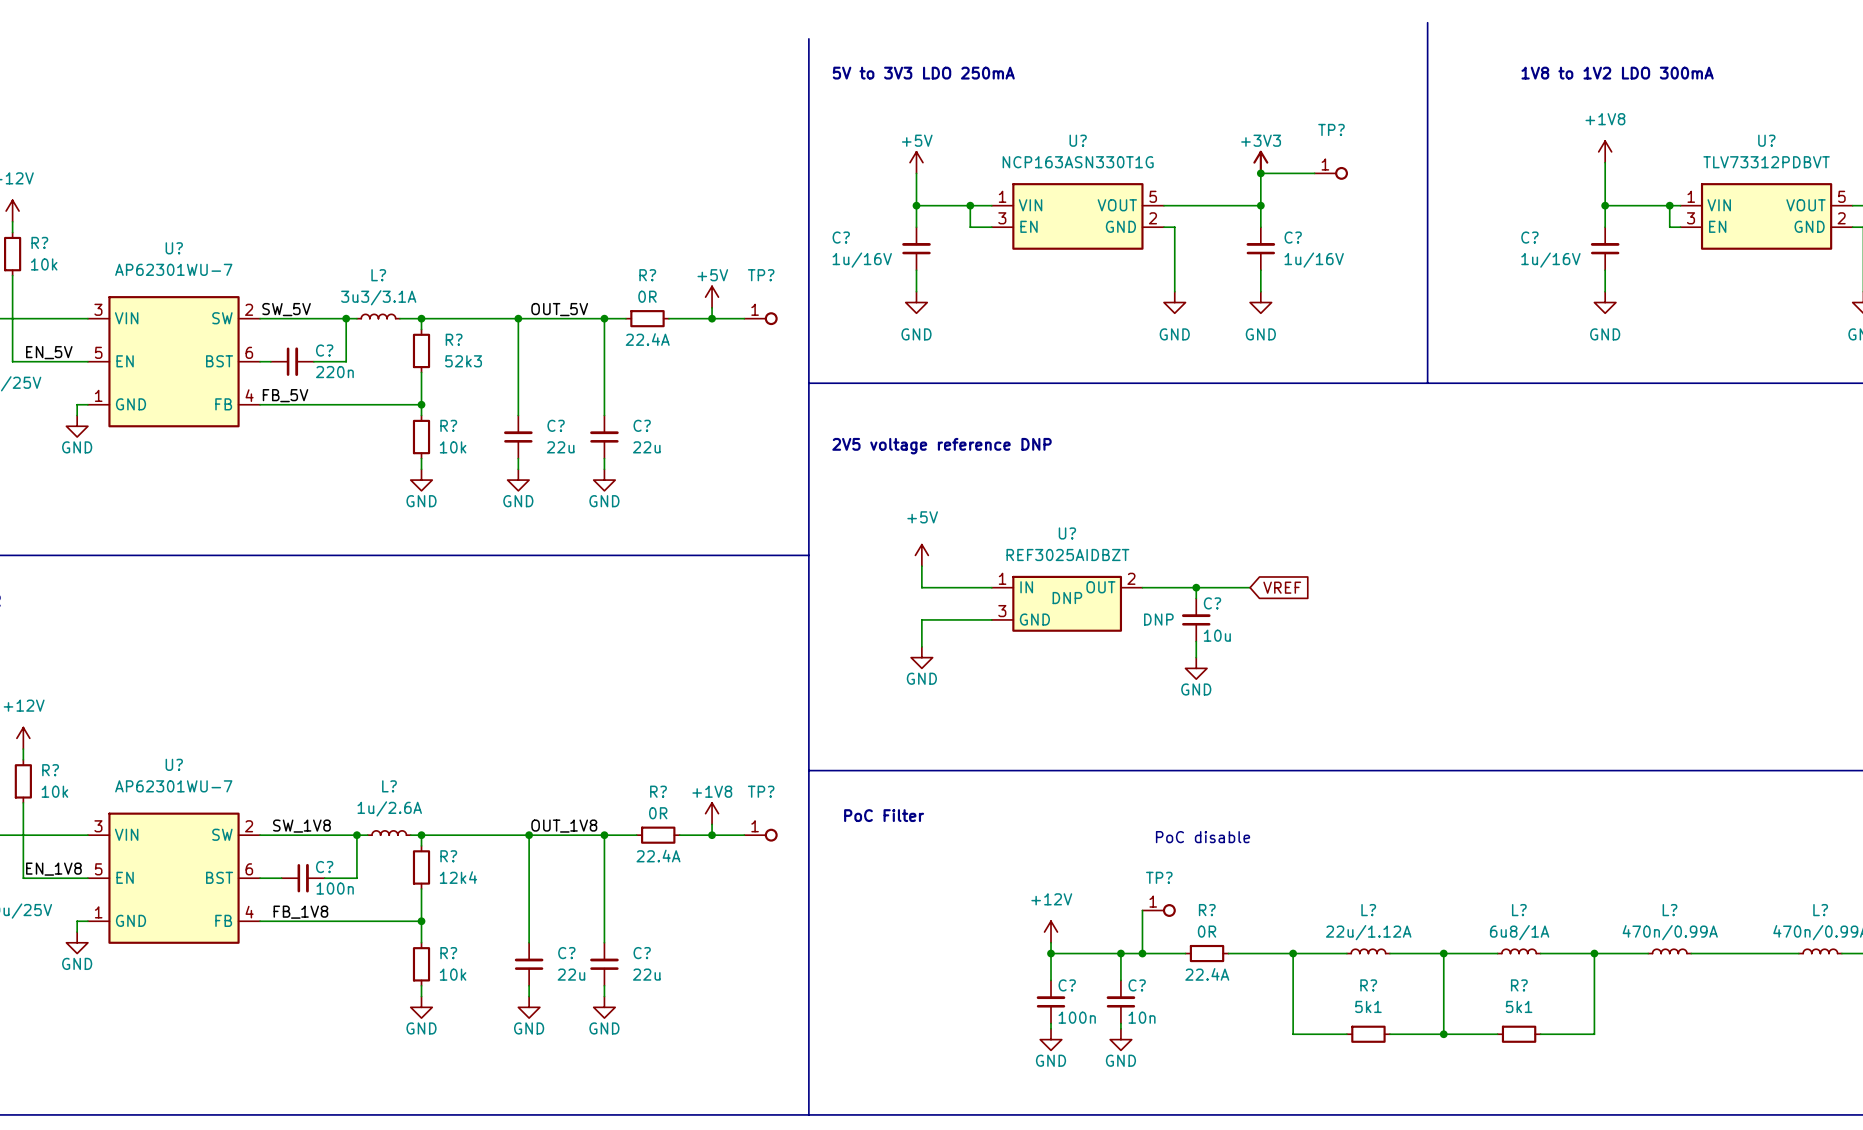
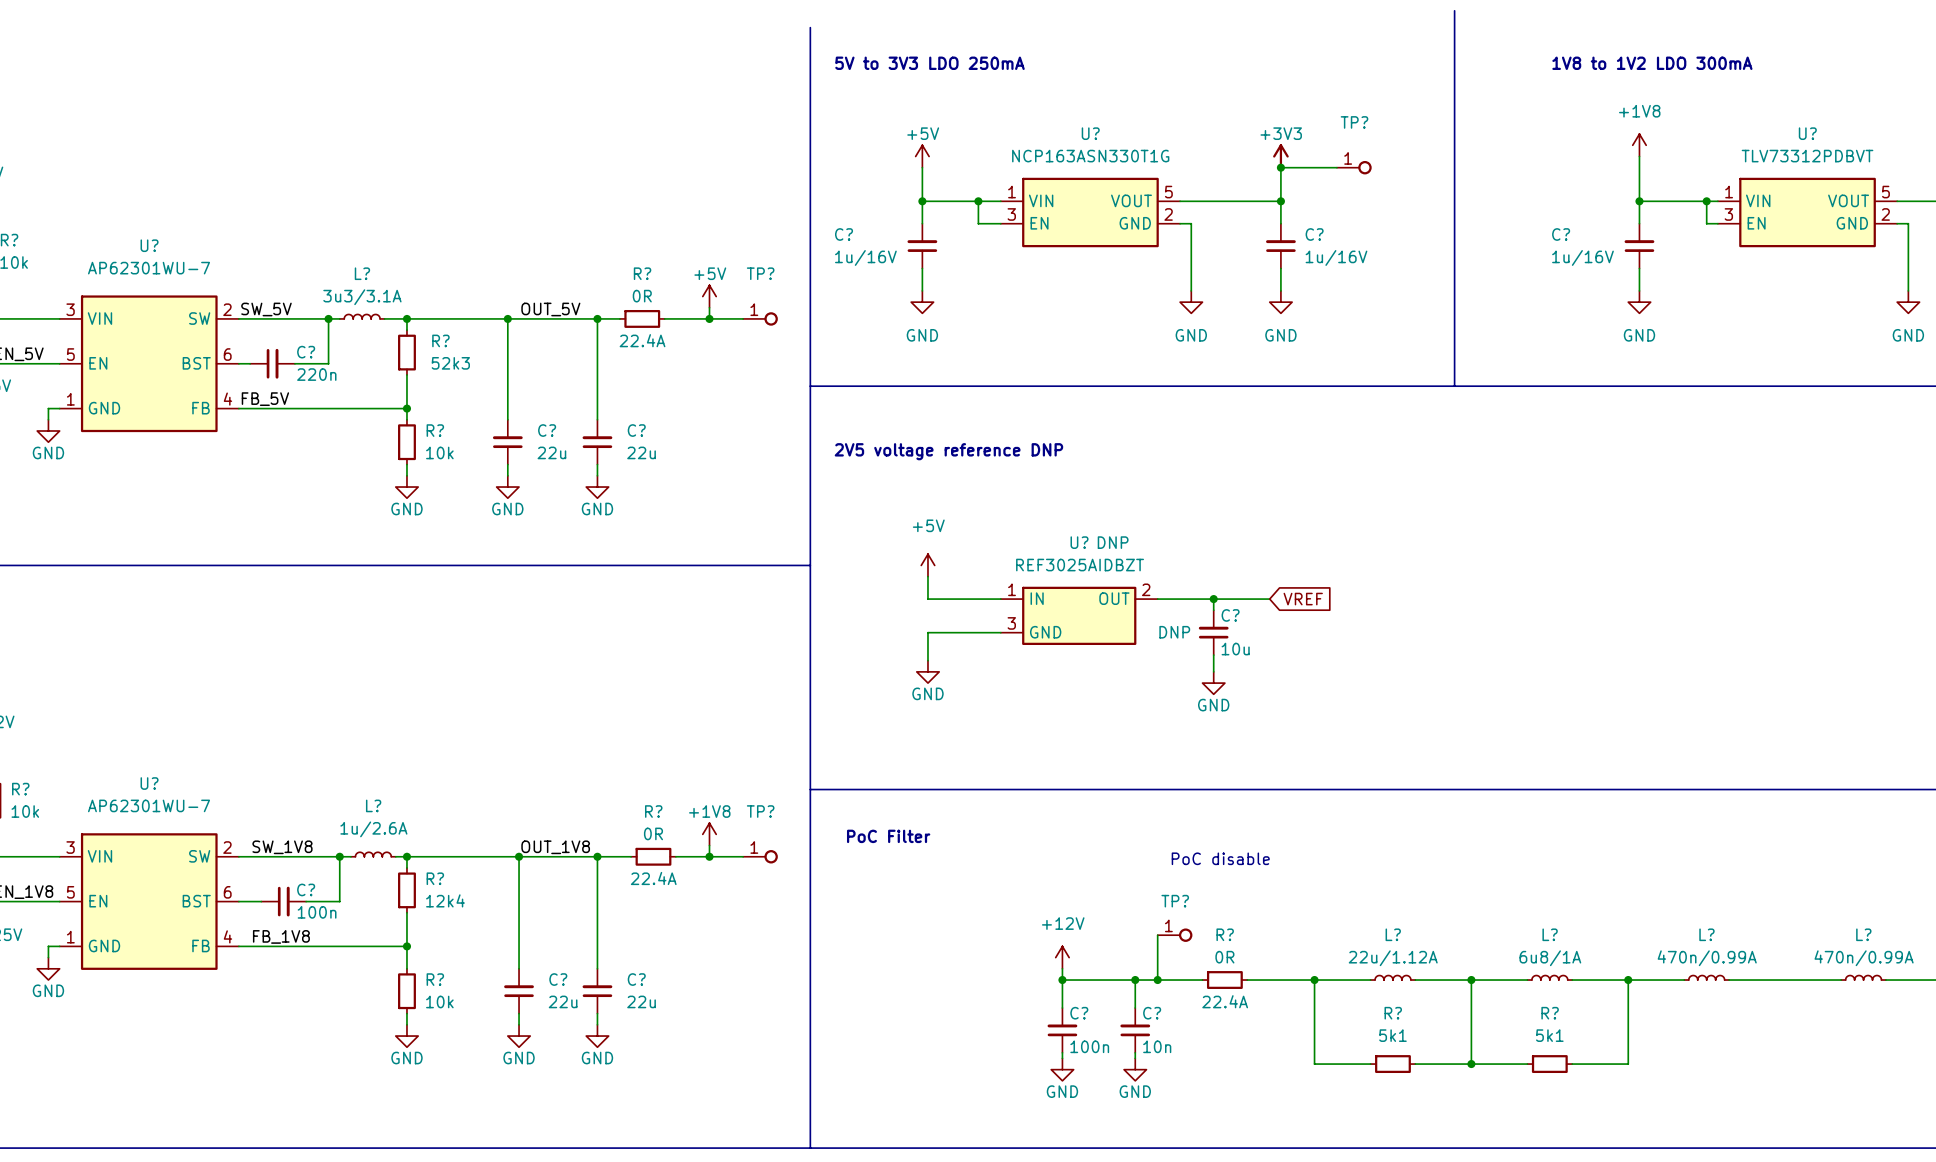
U? text position: DNP (1067, 598) -> DNP (1113, 542)

